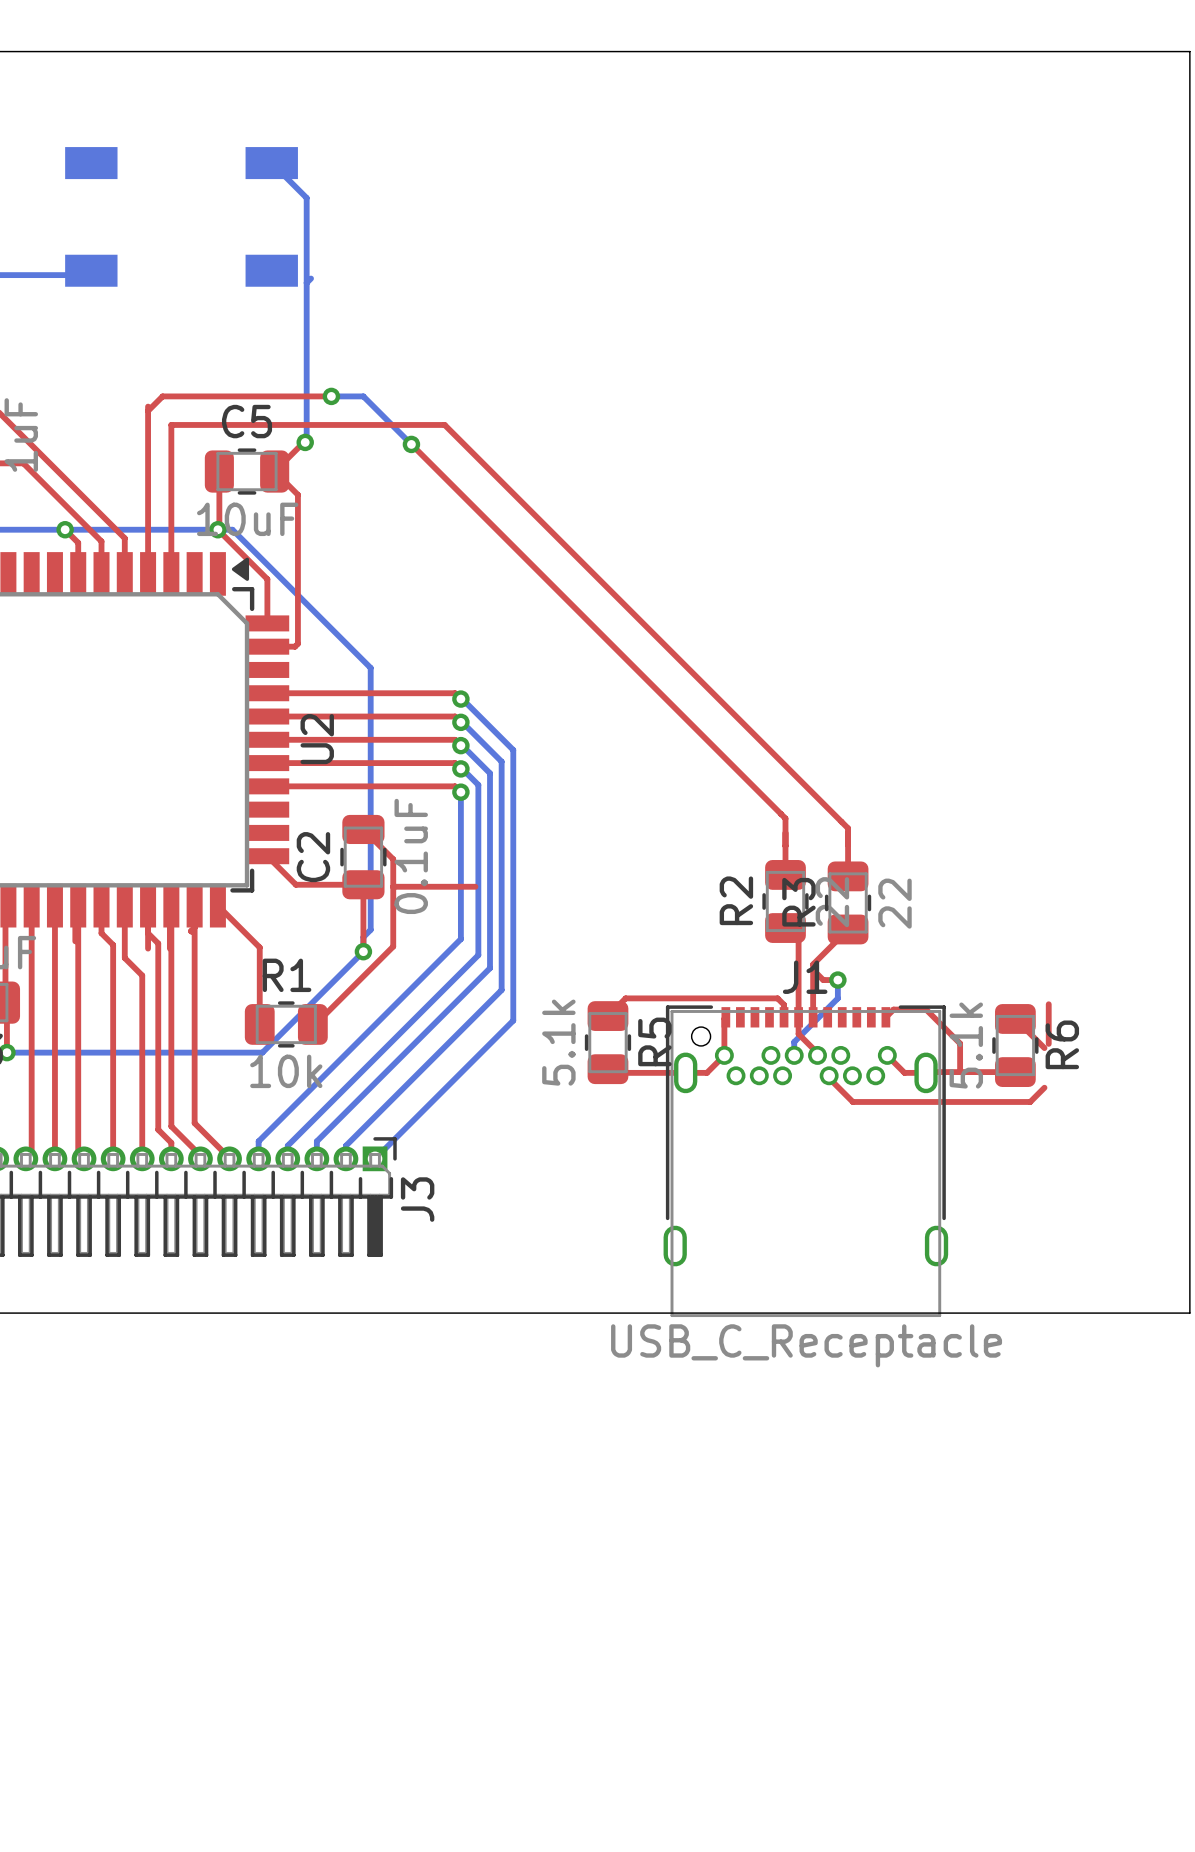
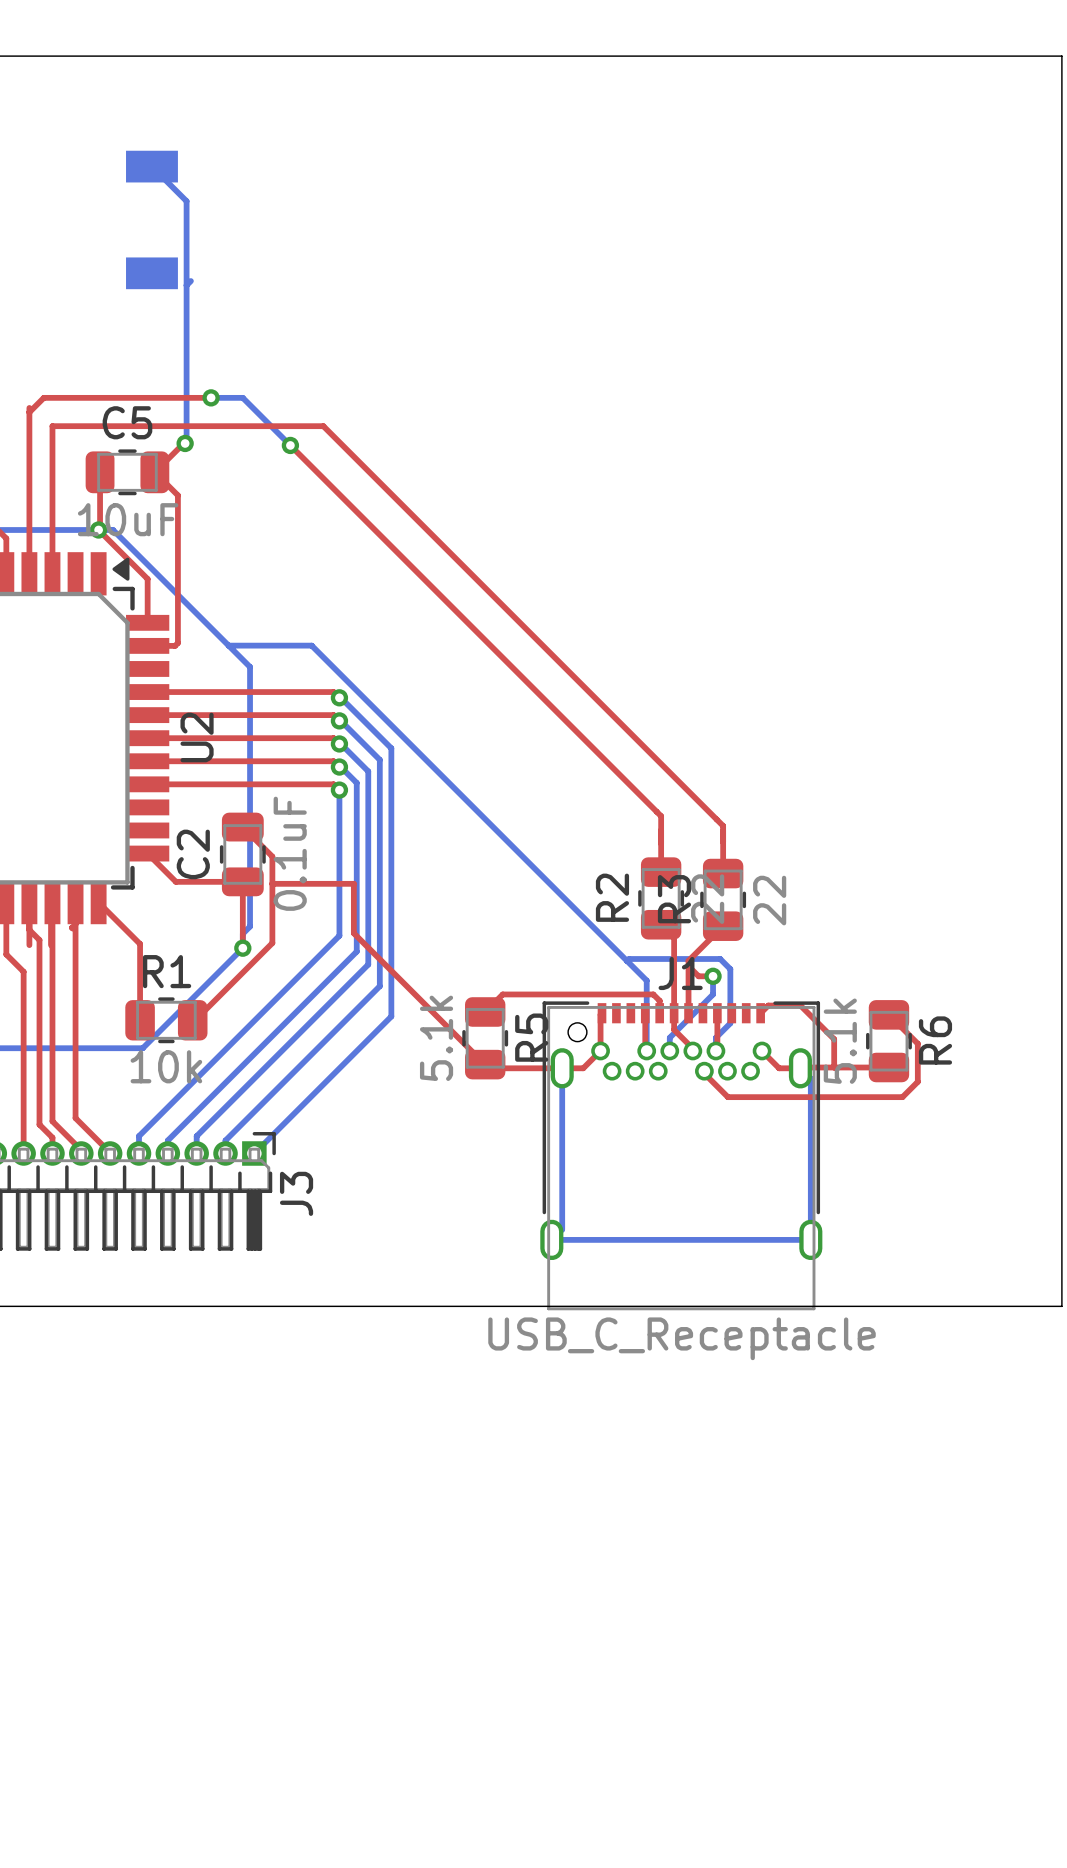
bottom track: none -> (228, 645) (311, 645) (646, 980) (646, 1050)
top track: none -> (353, 883) (353, 933) (485, 1064)
bottom track: none -> (627, 961) (629, 958) (720, 958) (730, 969) (730, 1023) (715, 1037) (715, 1050)
top track: (1048, 1004) (1048, 1043) -> none
top track: none -> (645, 1013) (646, 1050)
top track: none -> (717, 1013) (715, 1050)
bottom track: none -> (562, 1068) (562, 1229) (551, 1239) (810, 1239) (810, 1078) (800, 1068)
top track: (1044, 1087) (1029, 1101) -> (917, 1043) (917, 1081) (902, 1097)

